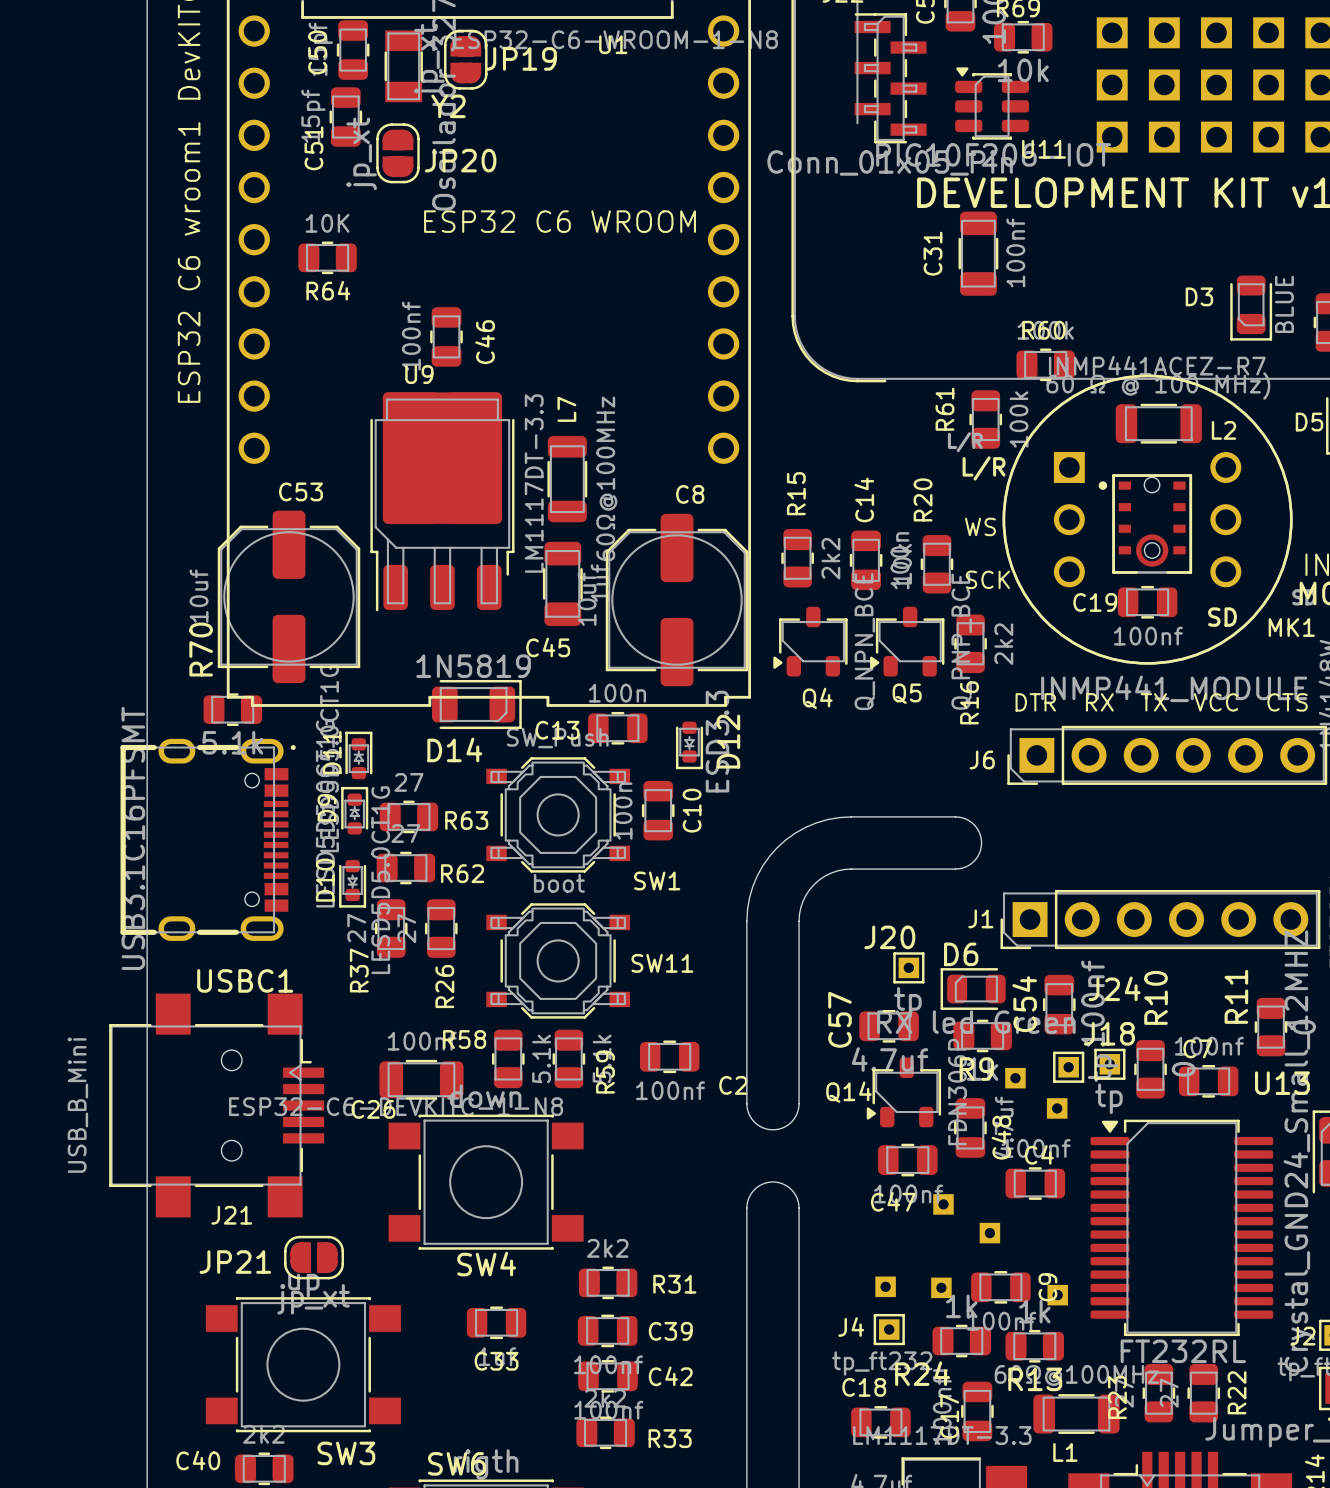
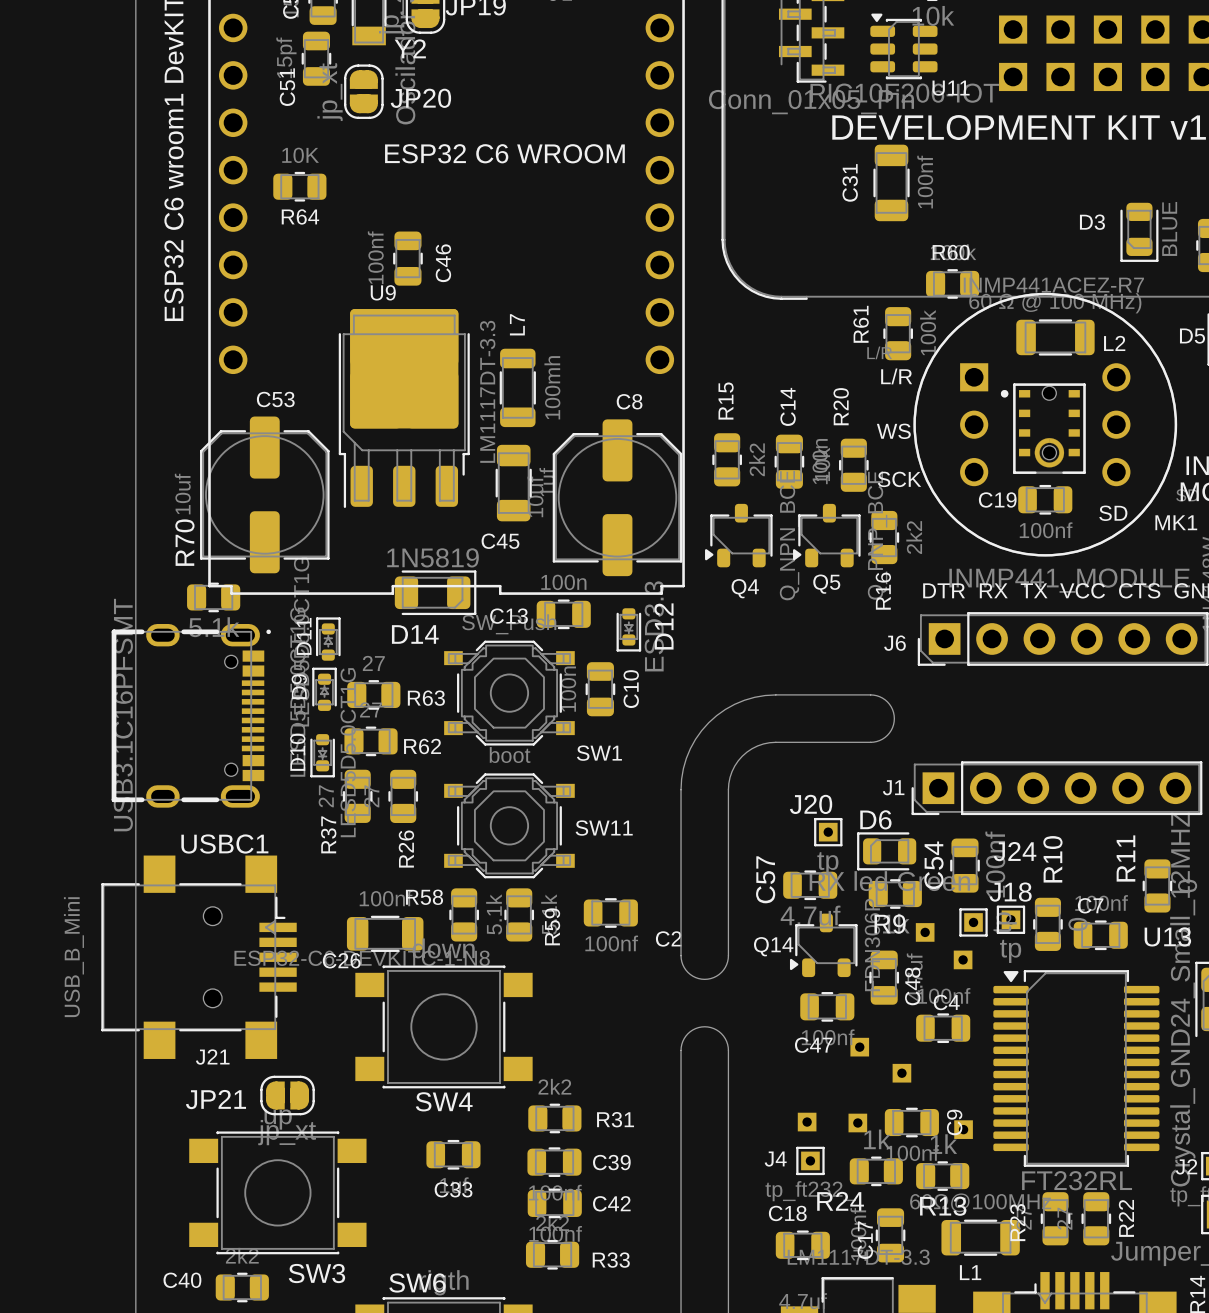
L7 value: 60Ω@100MHz (606, 478) -> 100mh (552, 387)

